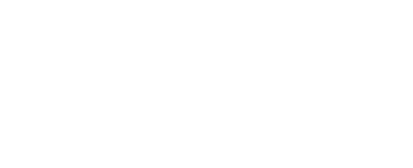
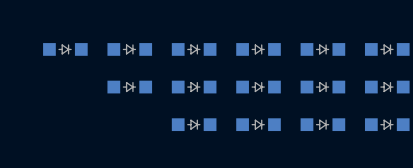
part: none -> (65, 49)
part: none -> (129, 49)
part: none -> (194, 49)
part: none -> (258, 49)
part: none -> (322, 49)
part: none -> (387, 49)
part: none -> (129, 87)
part: none -> (194, 87)
part: none -> (258, 87)
part: none -> (322, 87)
part: none -> (387, 87)
part: none -> (194, 124)
part: none -> (258, 124)
part: none -> (322, 124)
part: none -> (387, 124)

